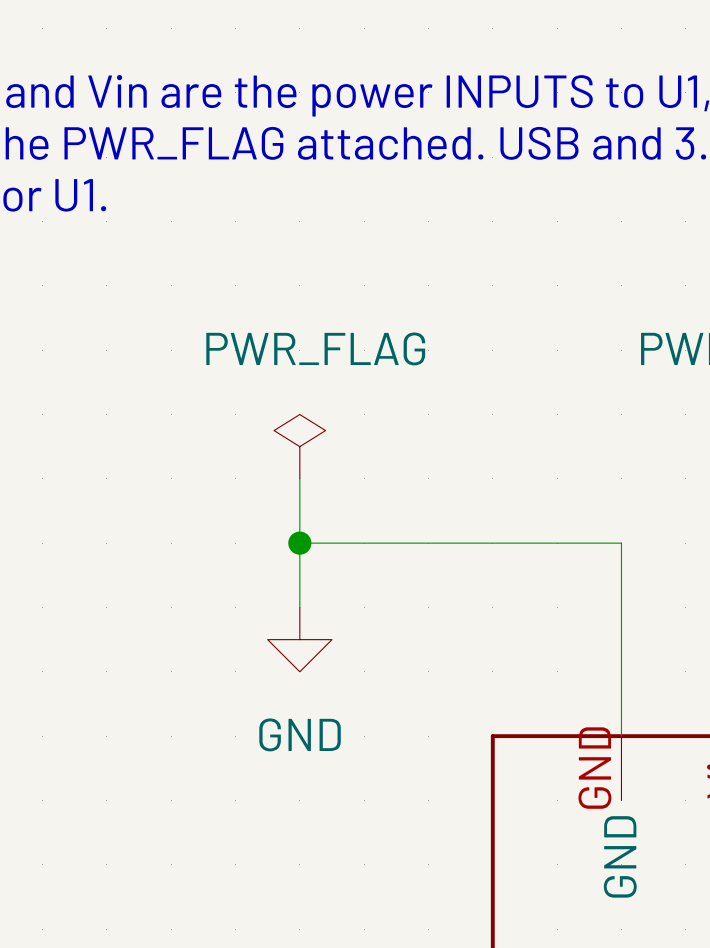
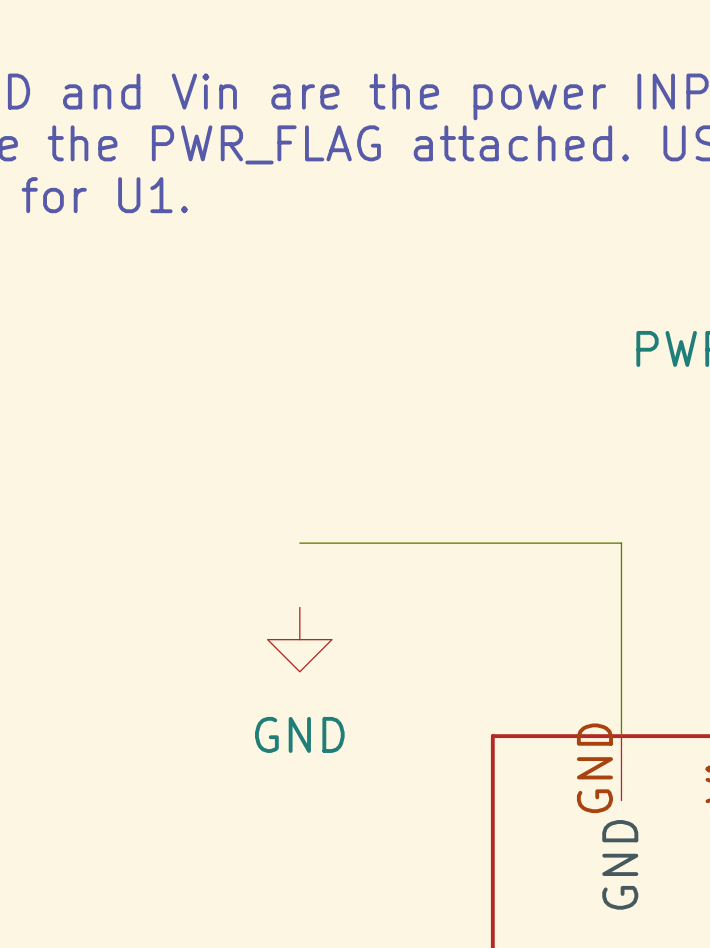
power symbol: PWR_FLAG (299, 446) -> none
wire: (299, 478) (299, 607) -> none
junction: (299, 543) -> none

